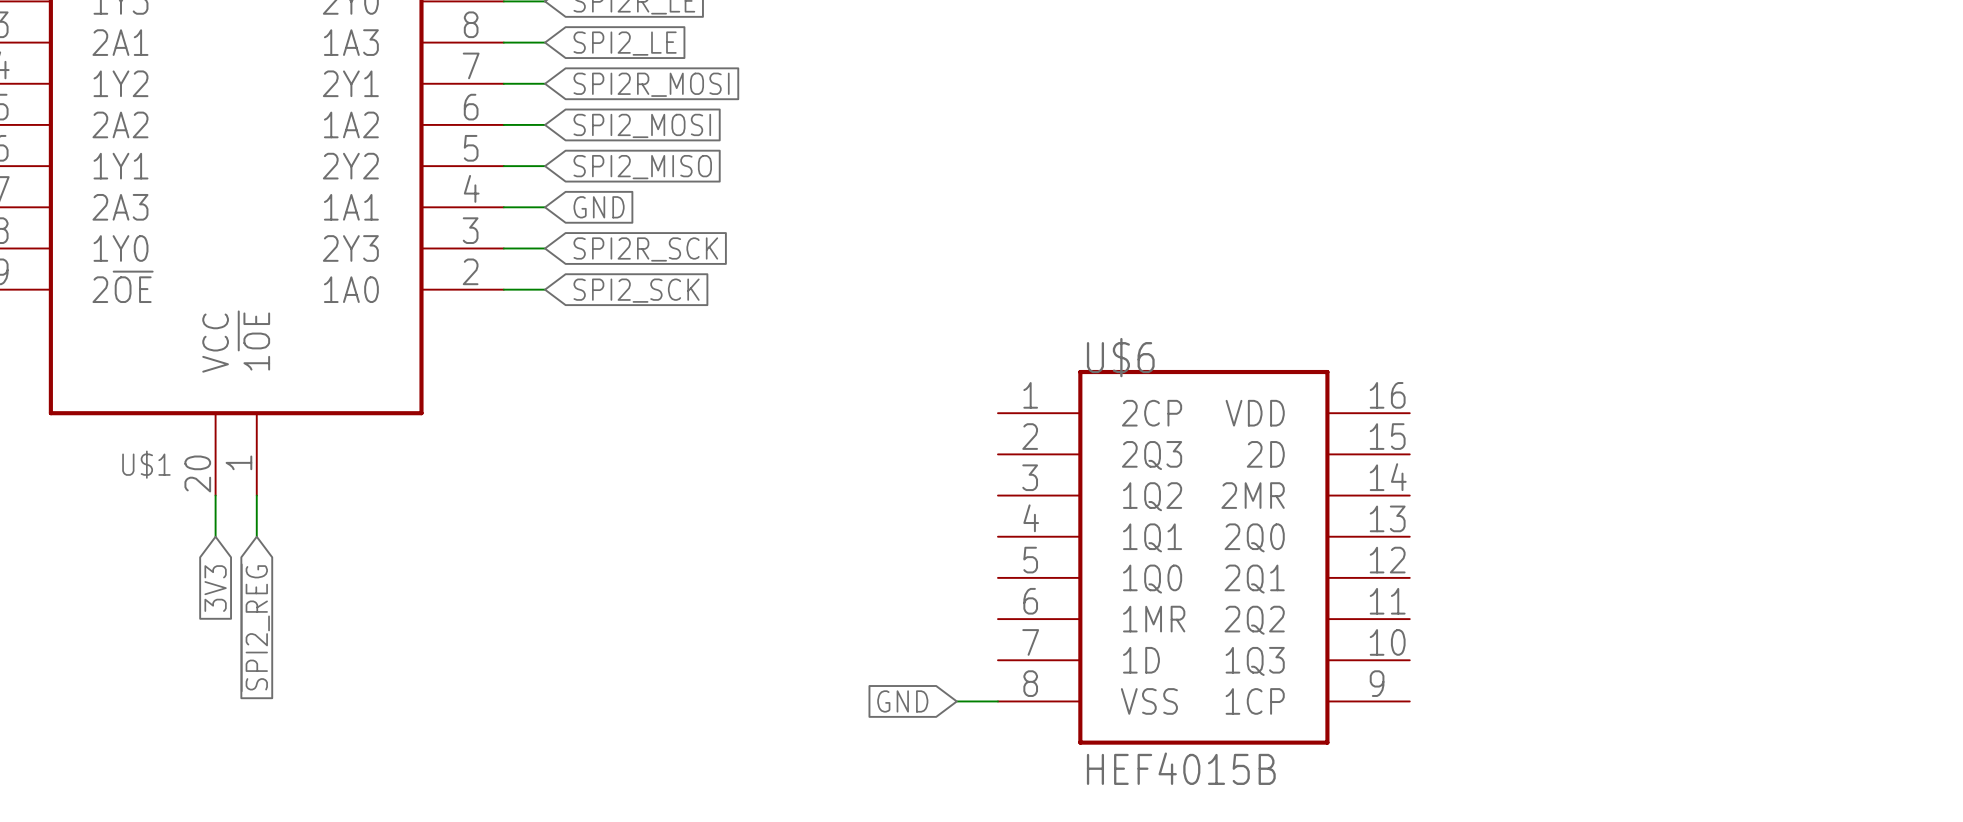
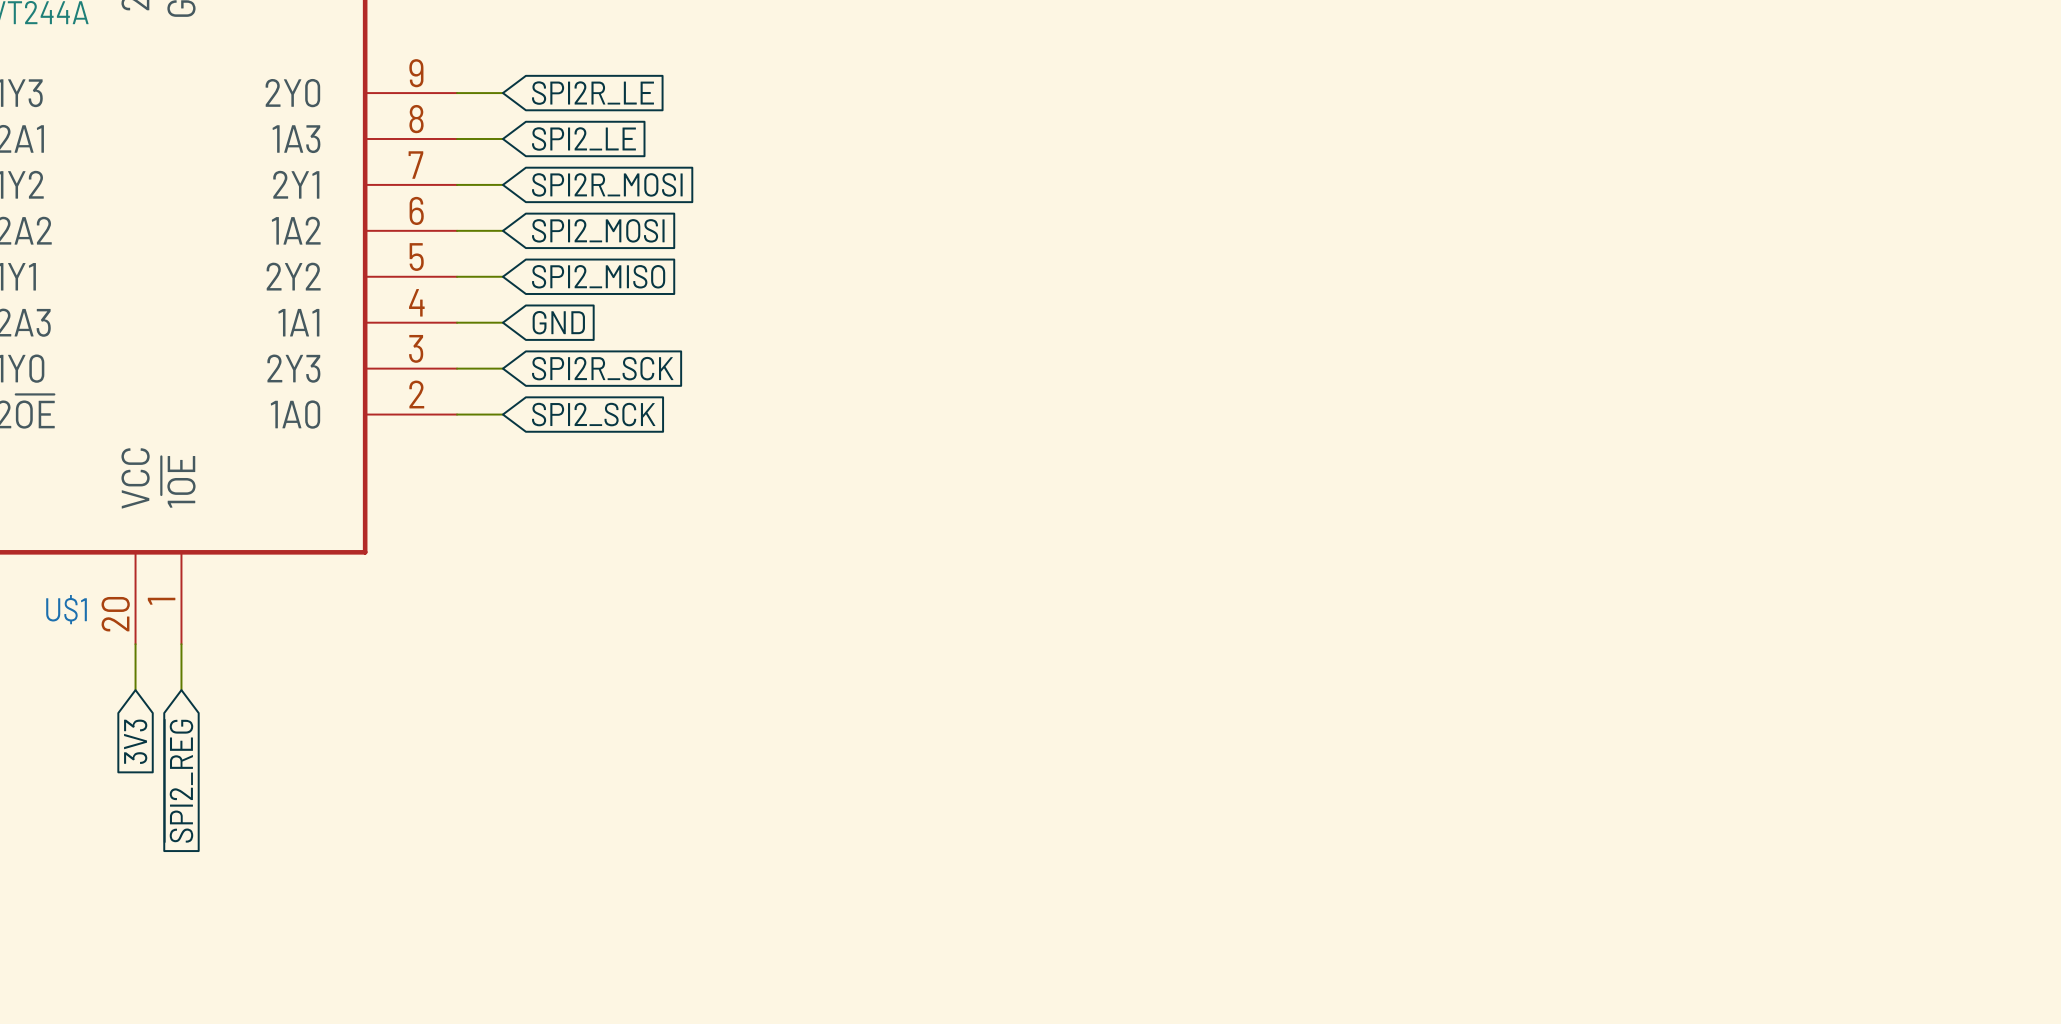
U$6: HEF4015B (1203, 557) -> none
global label: GND (902, 701) -> none
wire: (956, 701) (997, 701) -> none

